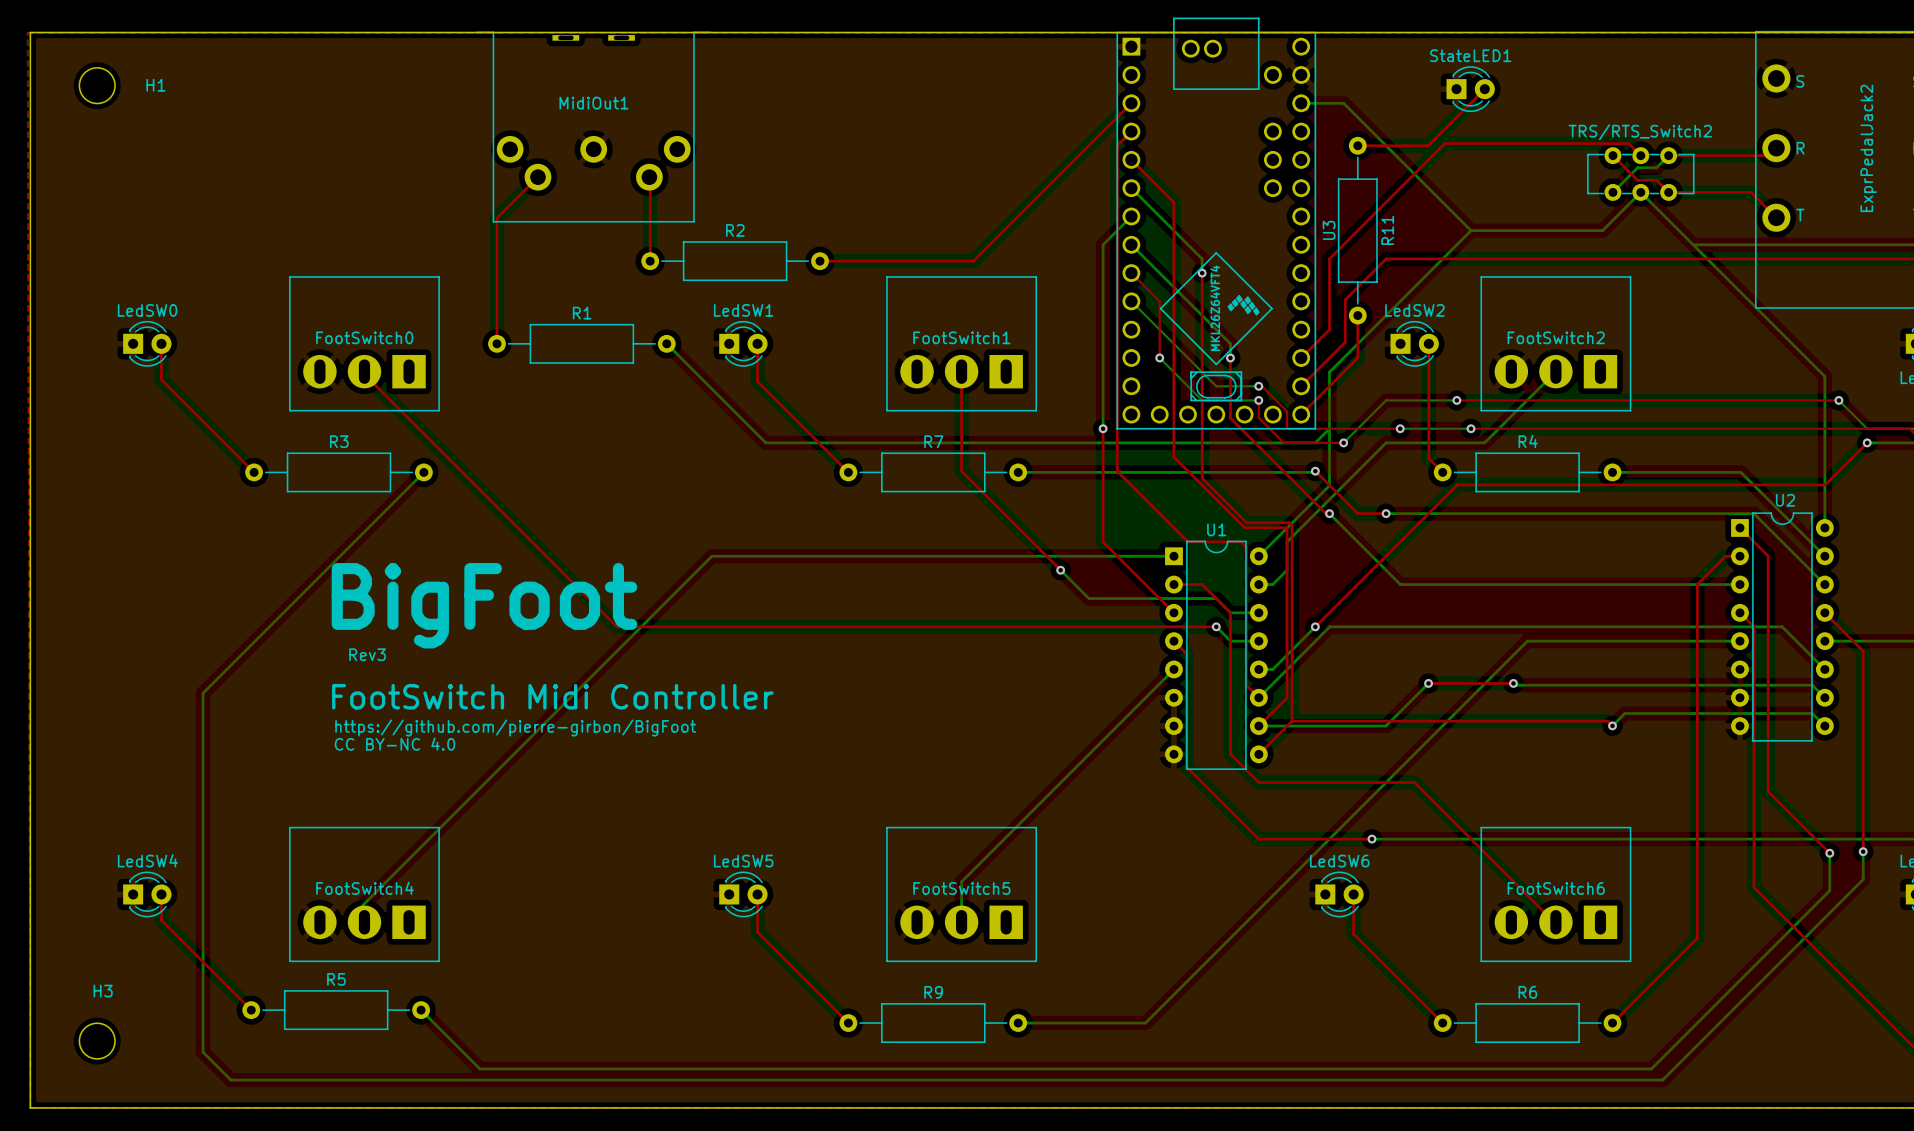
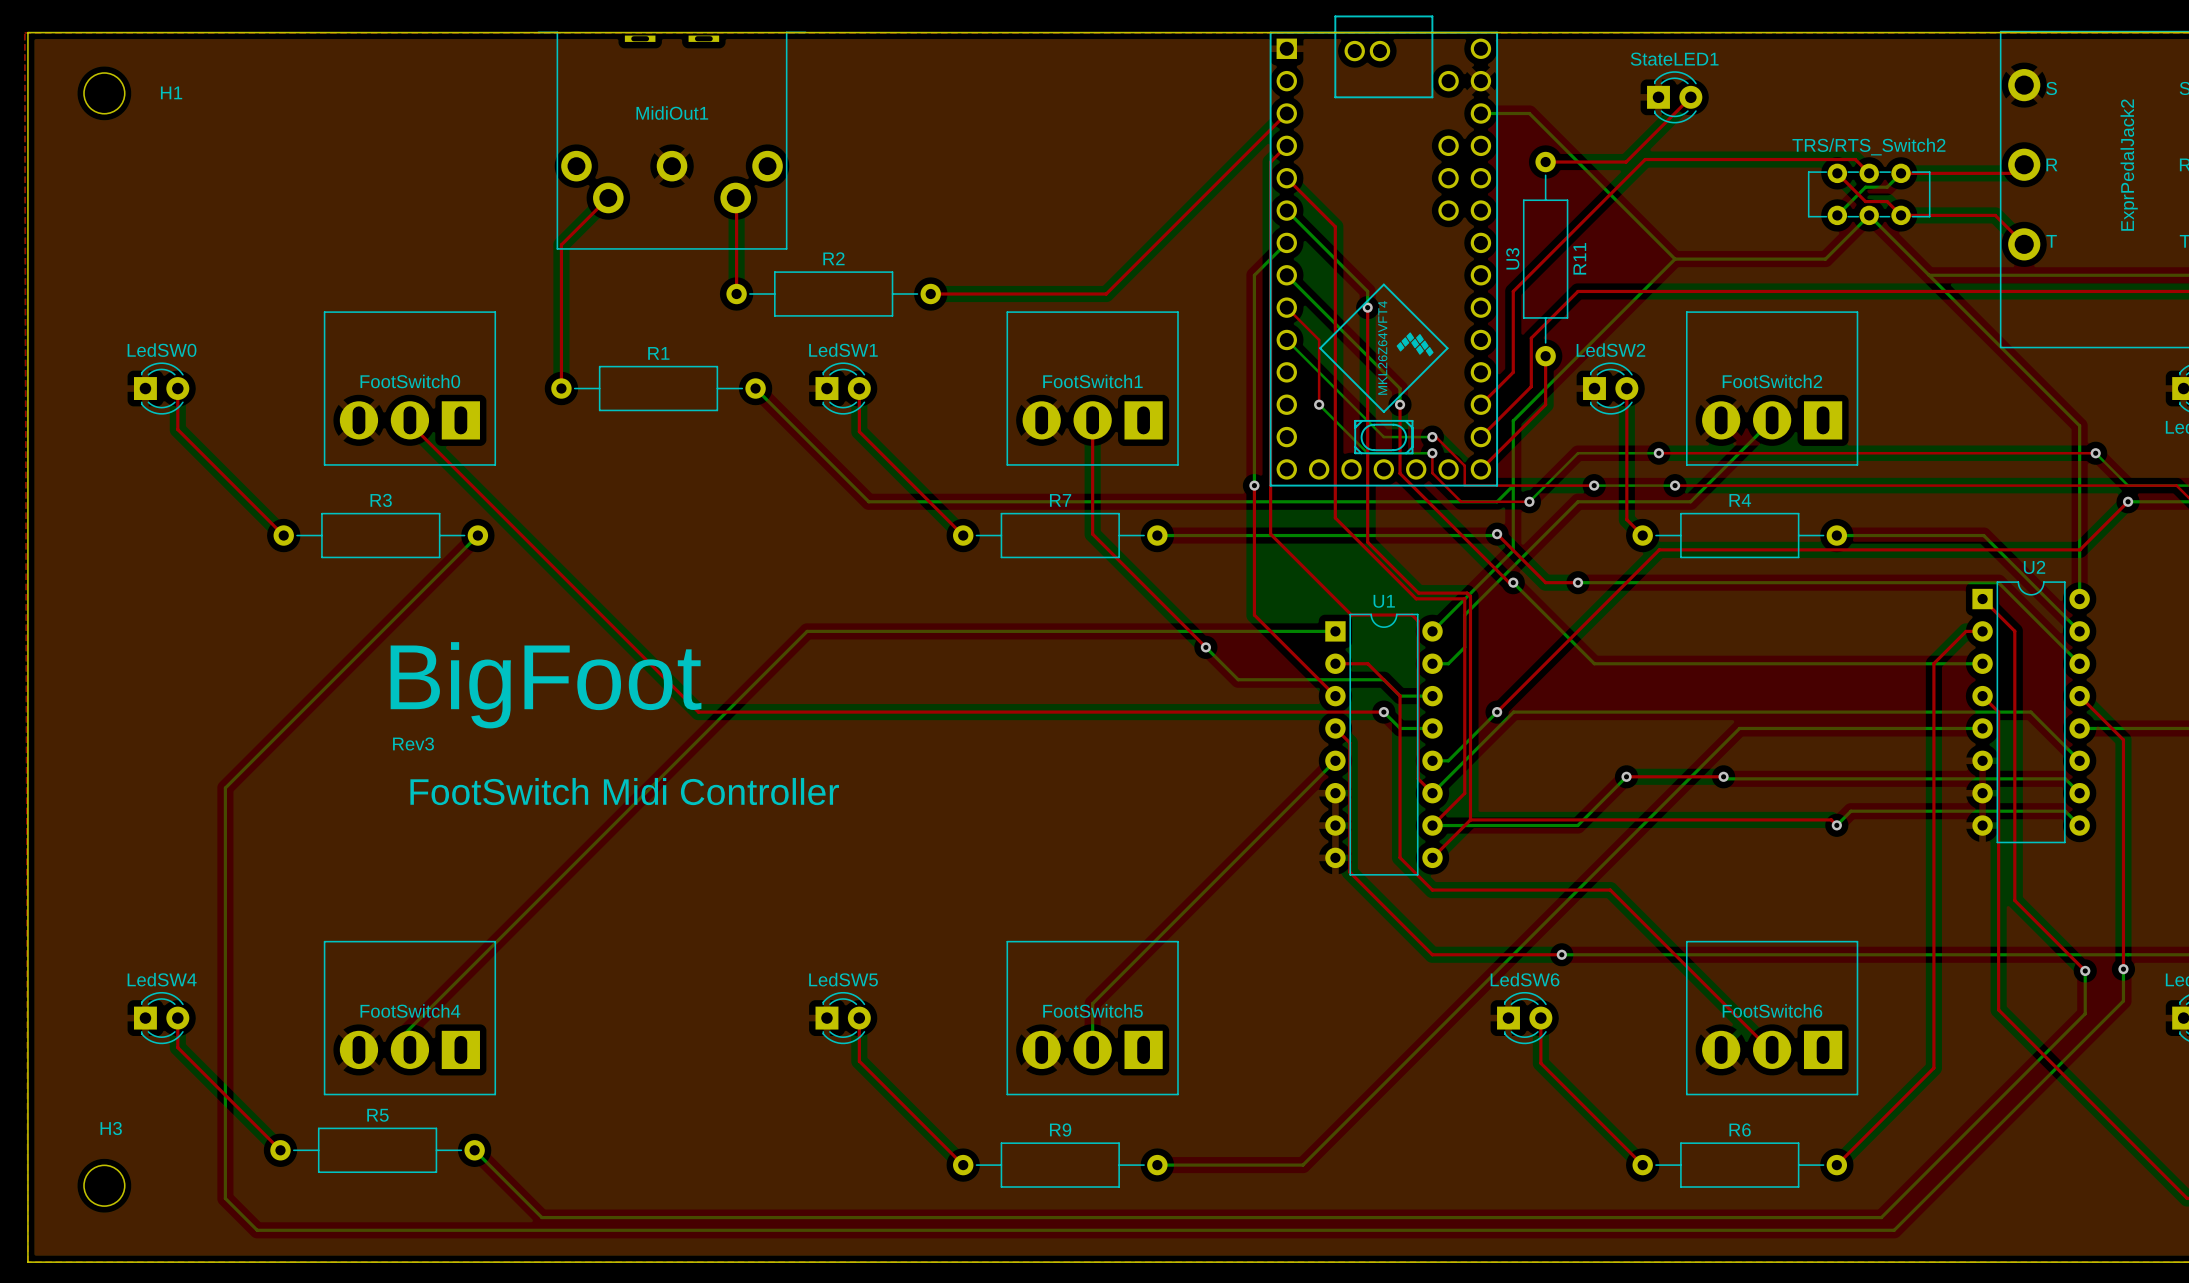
text: https://github.com/pierre-girbon/BigFoot (515, 728) -> none
text: CC BY-NC 4.0 (394, 744) -> none

